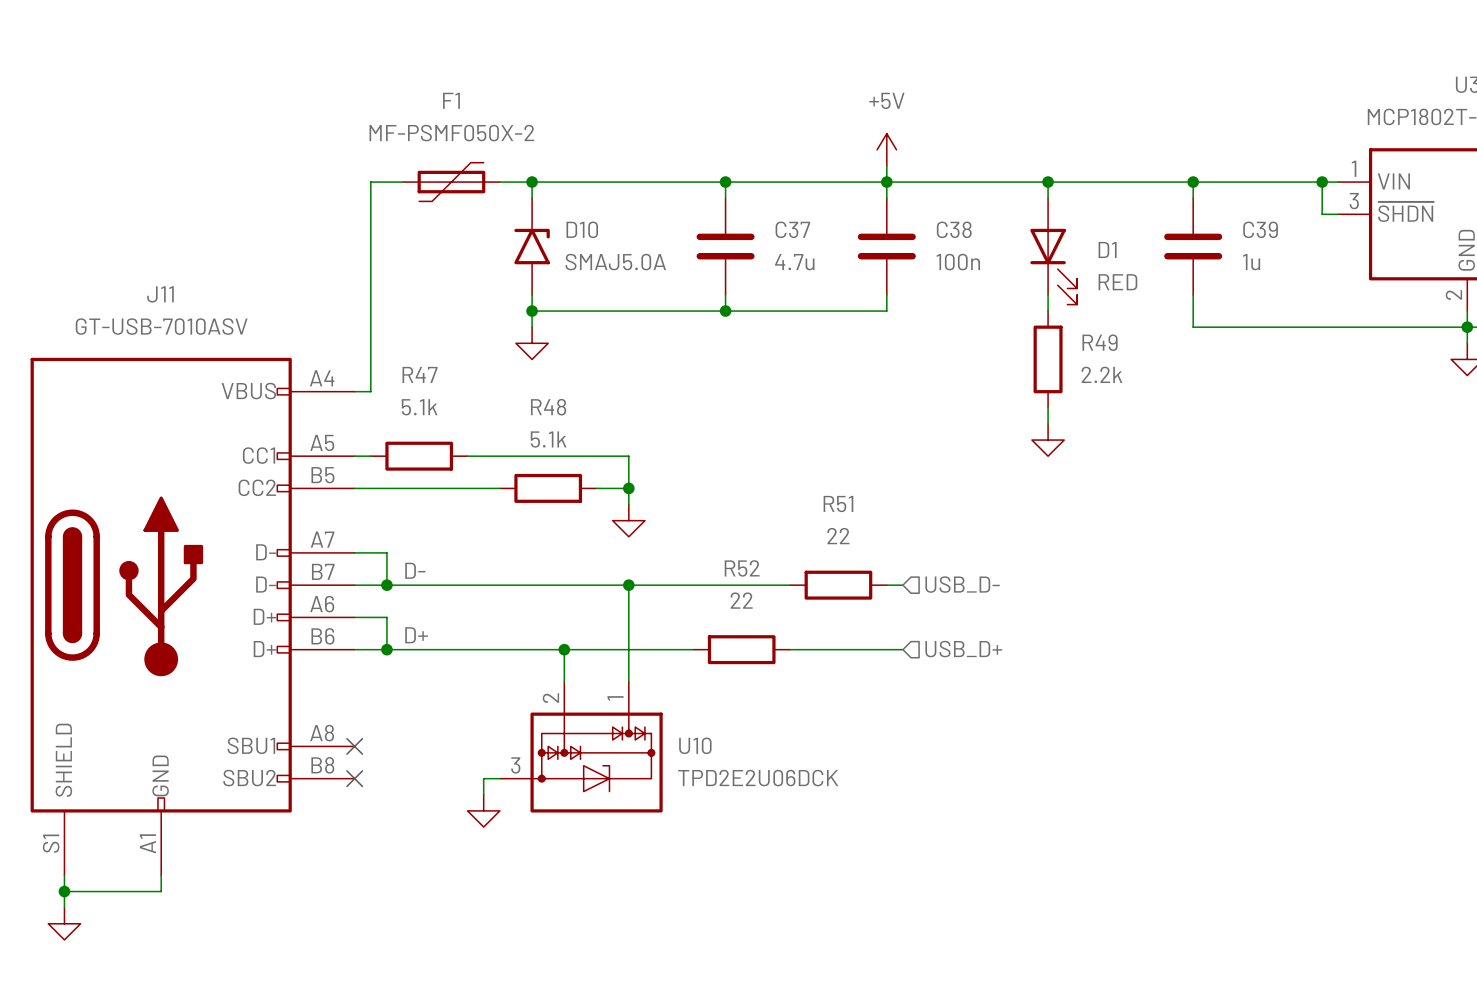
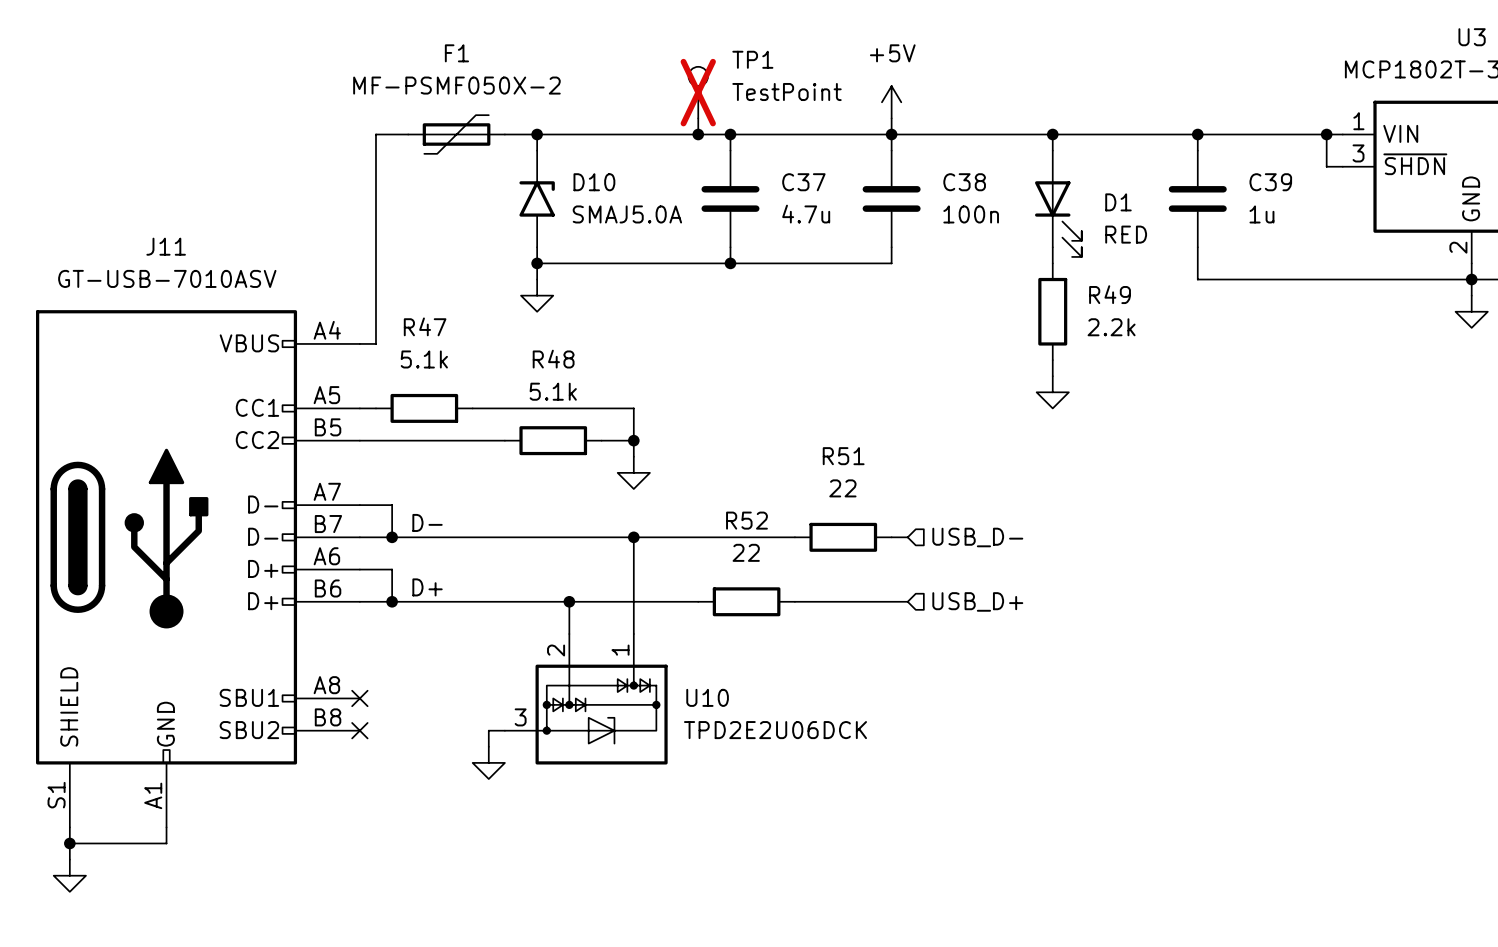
TP1: none -> TestPoint (698, 92)
wire: none -> (698, 118) (698, 134)
junction: none -> (698, 134)

